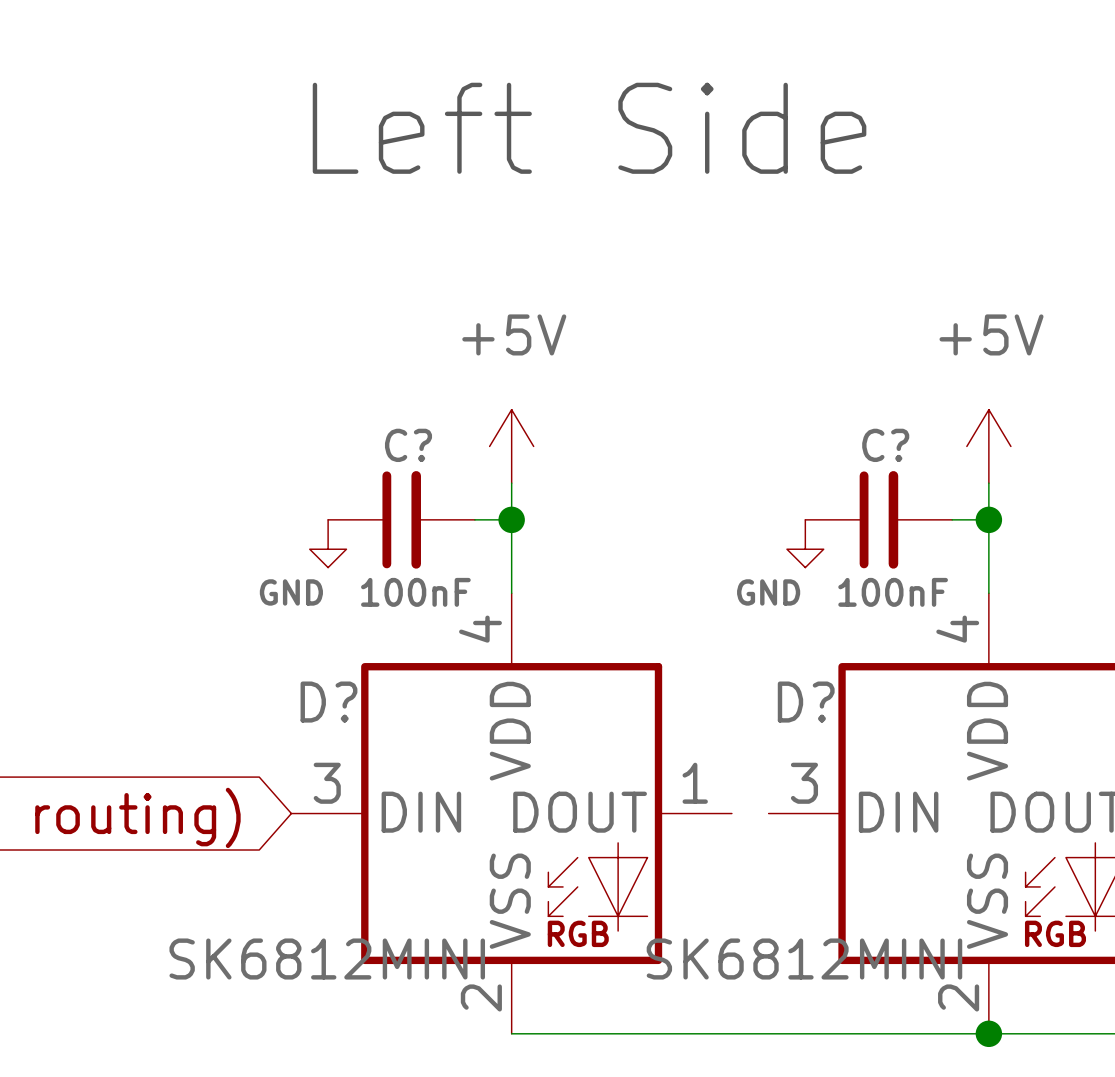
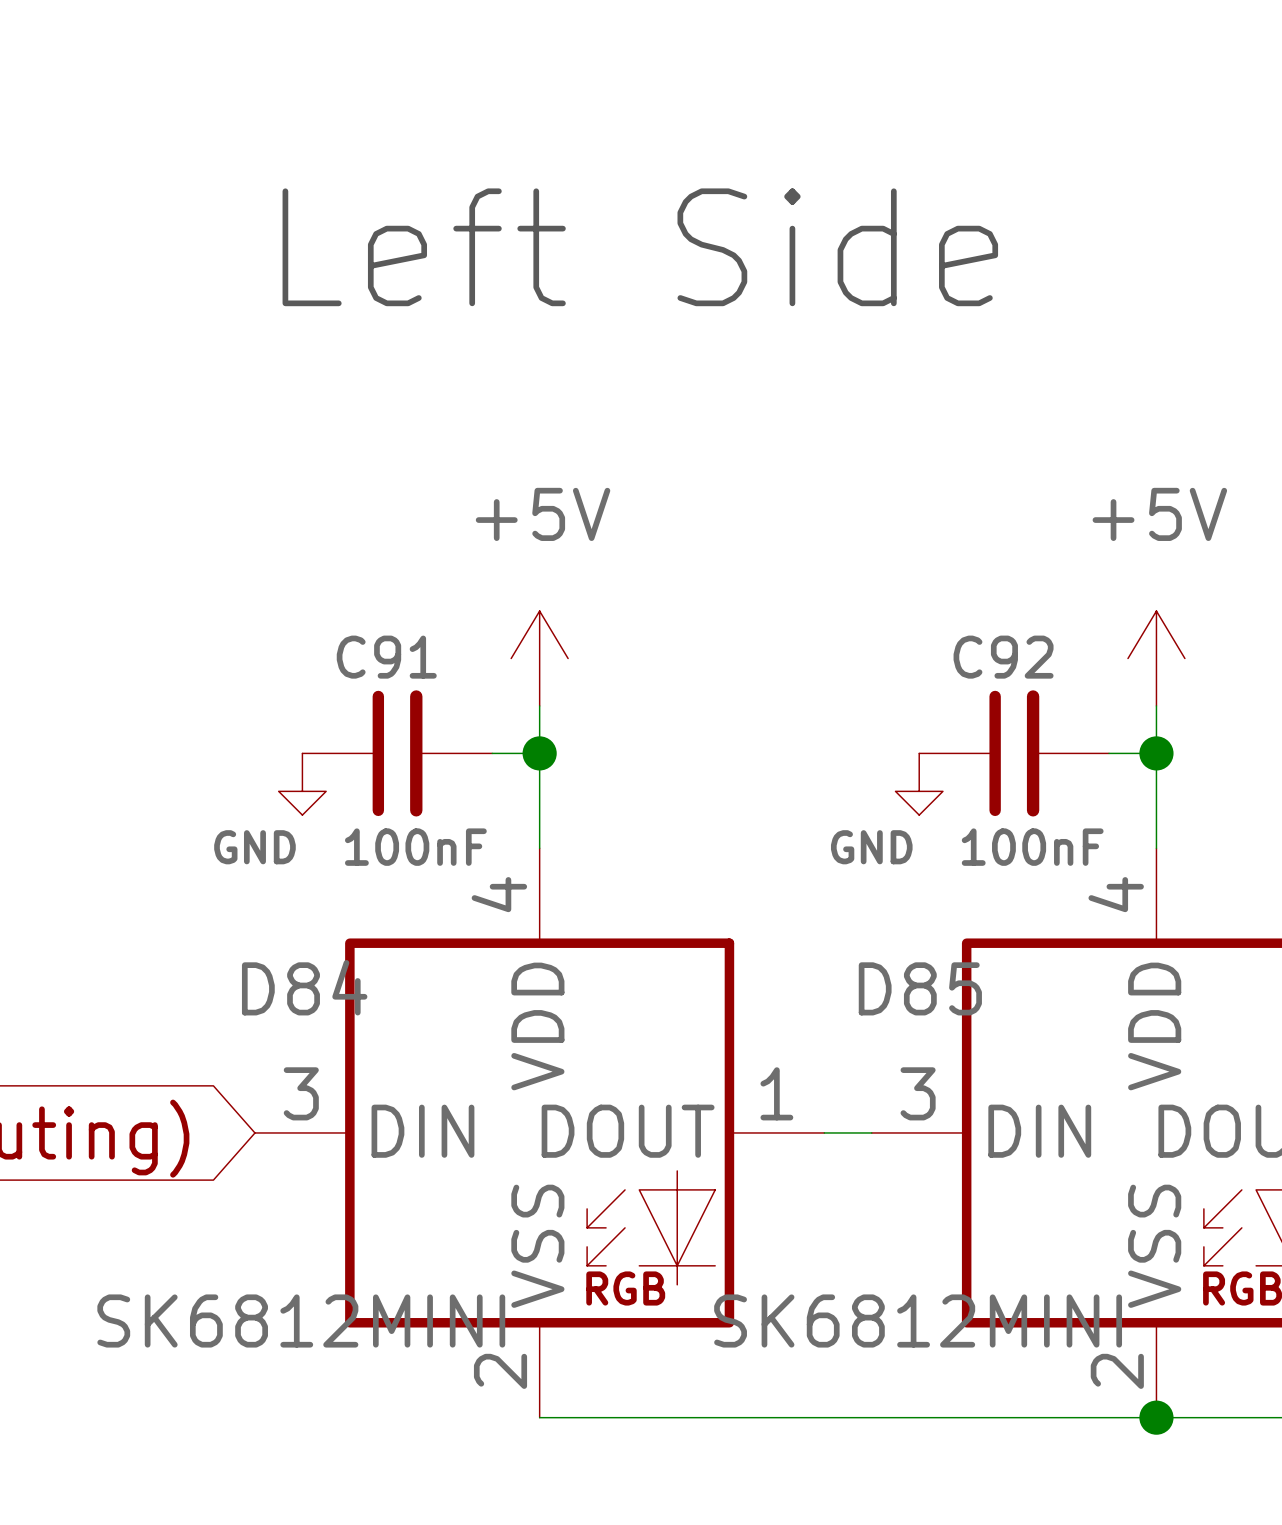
C? name: C? (408, 445) -> C91 (386, 657)
C? name: C? (885, 445) -> C92 (1003, 657)
D? name: D? (328, 702) -> D84 (304, 987)
D? name: D? (806, 702) -> D85 (920, 988)
wire: none -> (824, 1132) (871, 1132)

